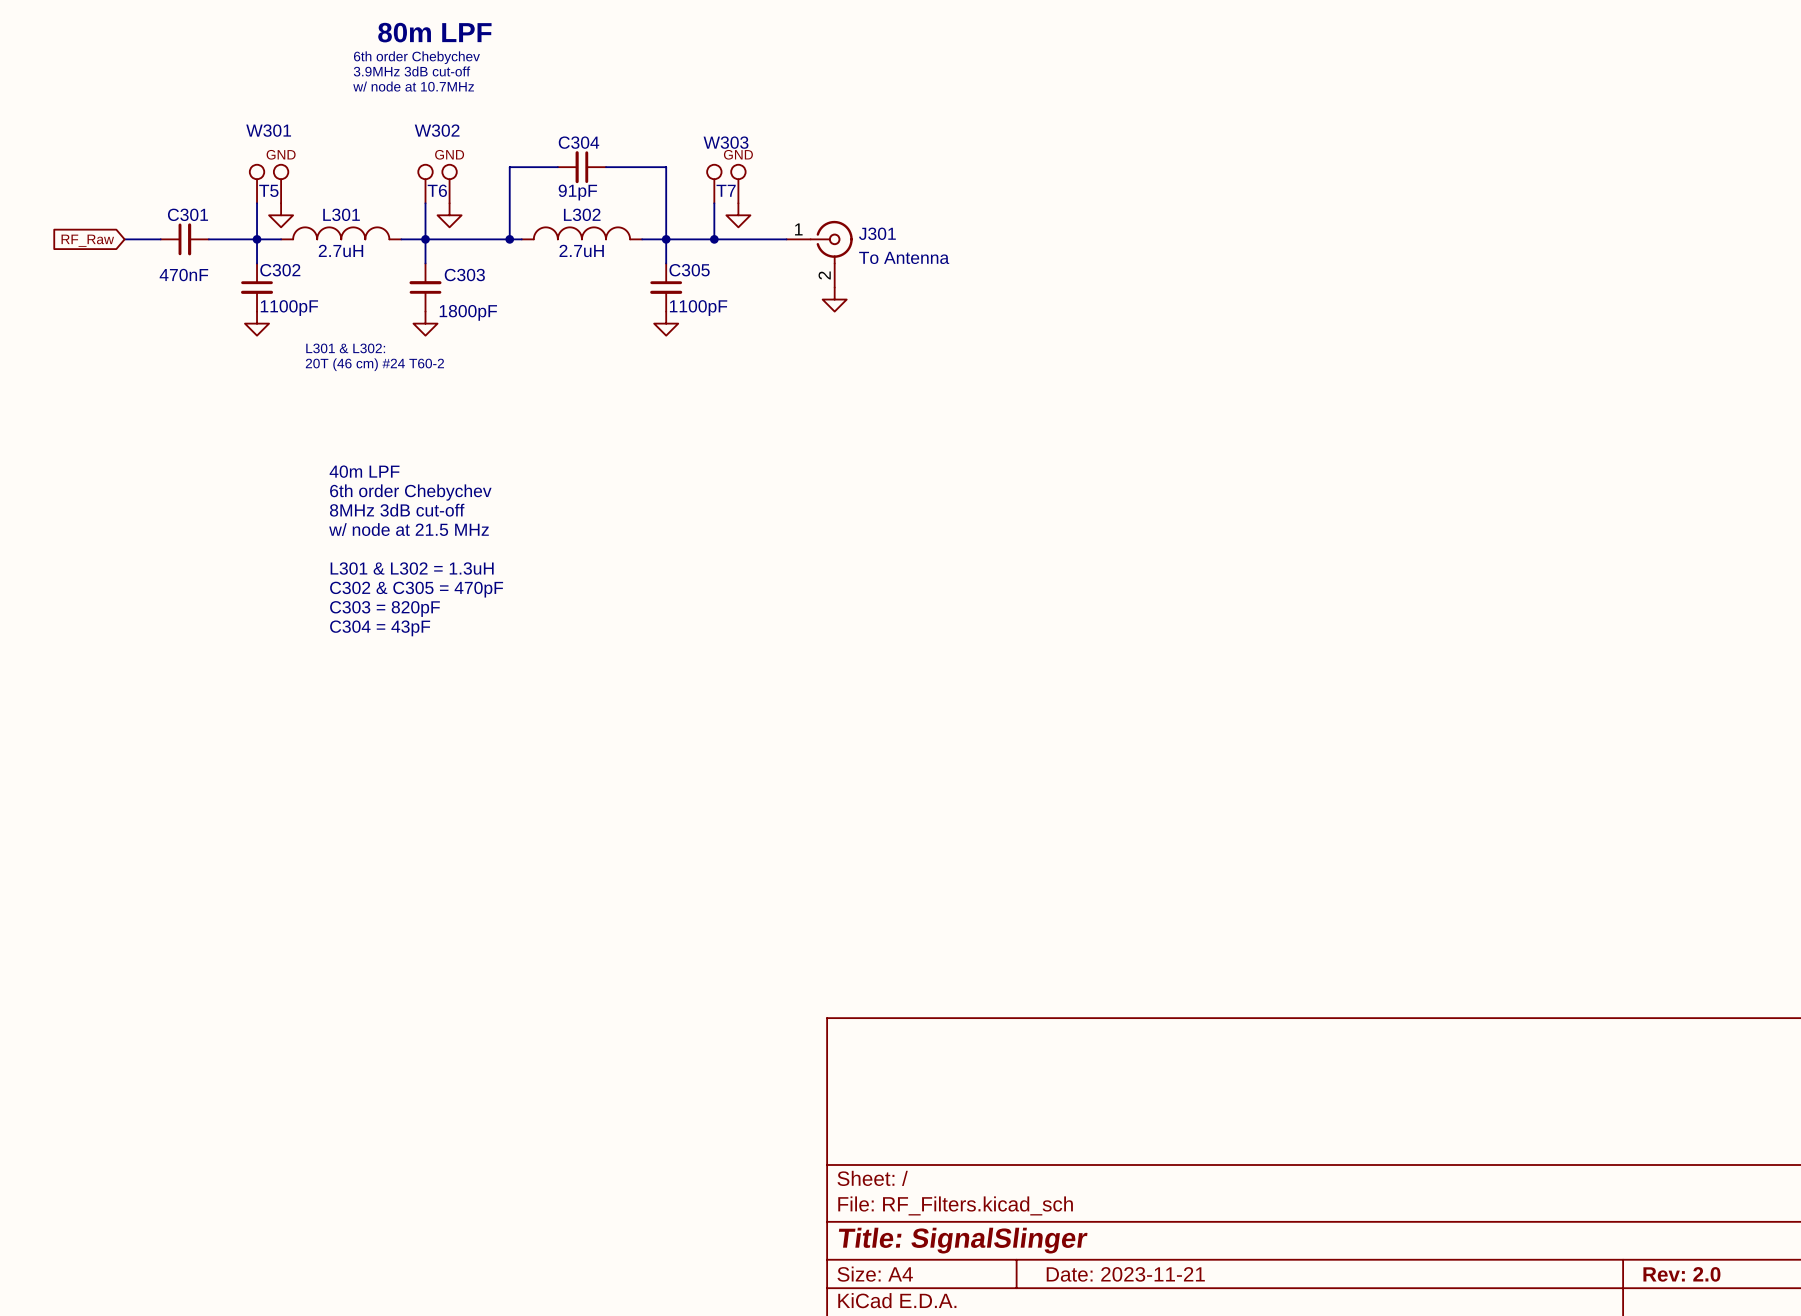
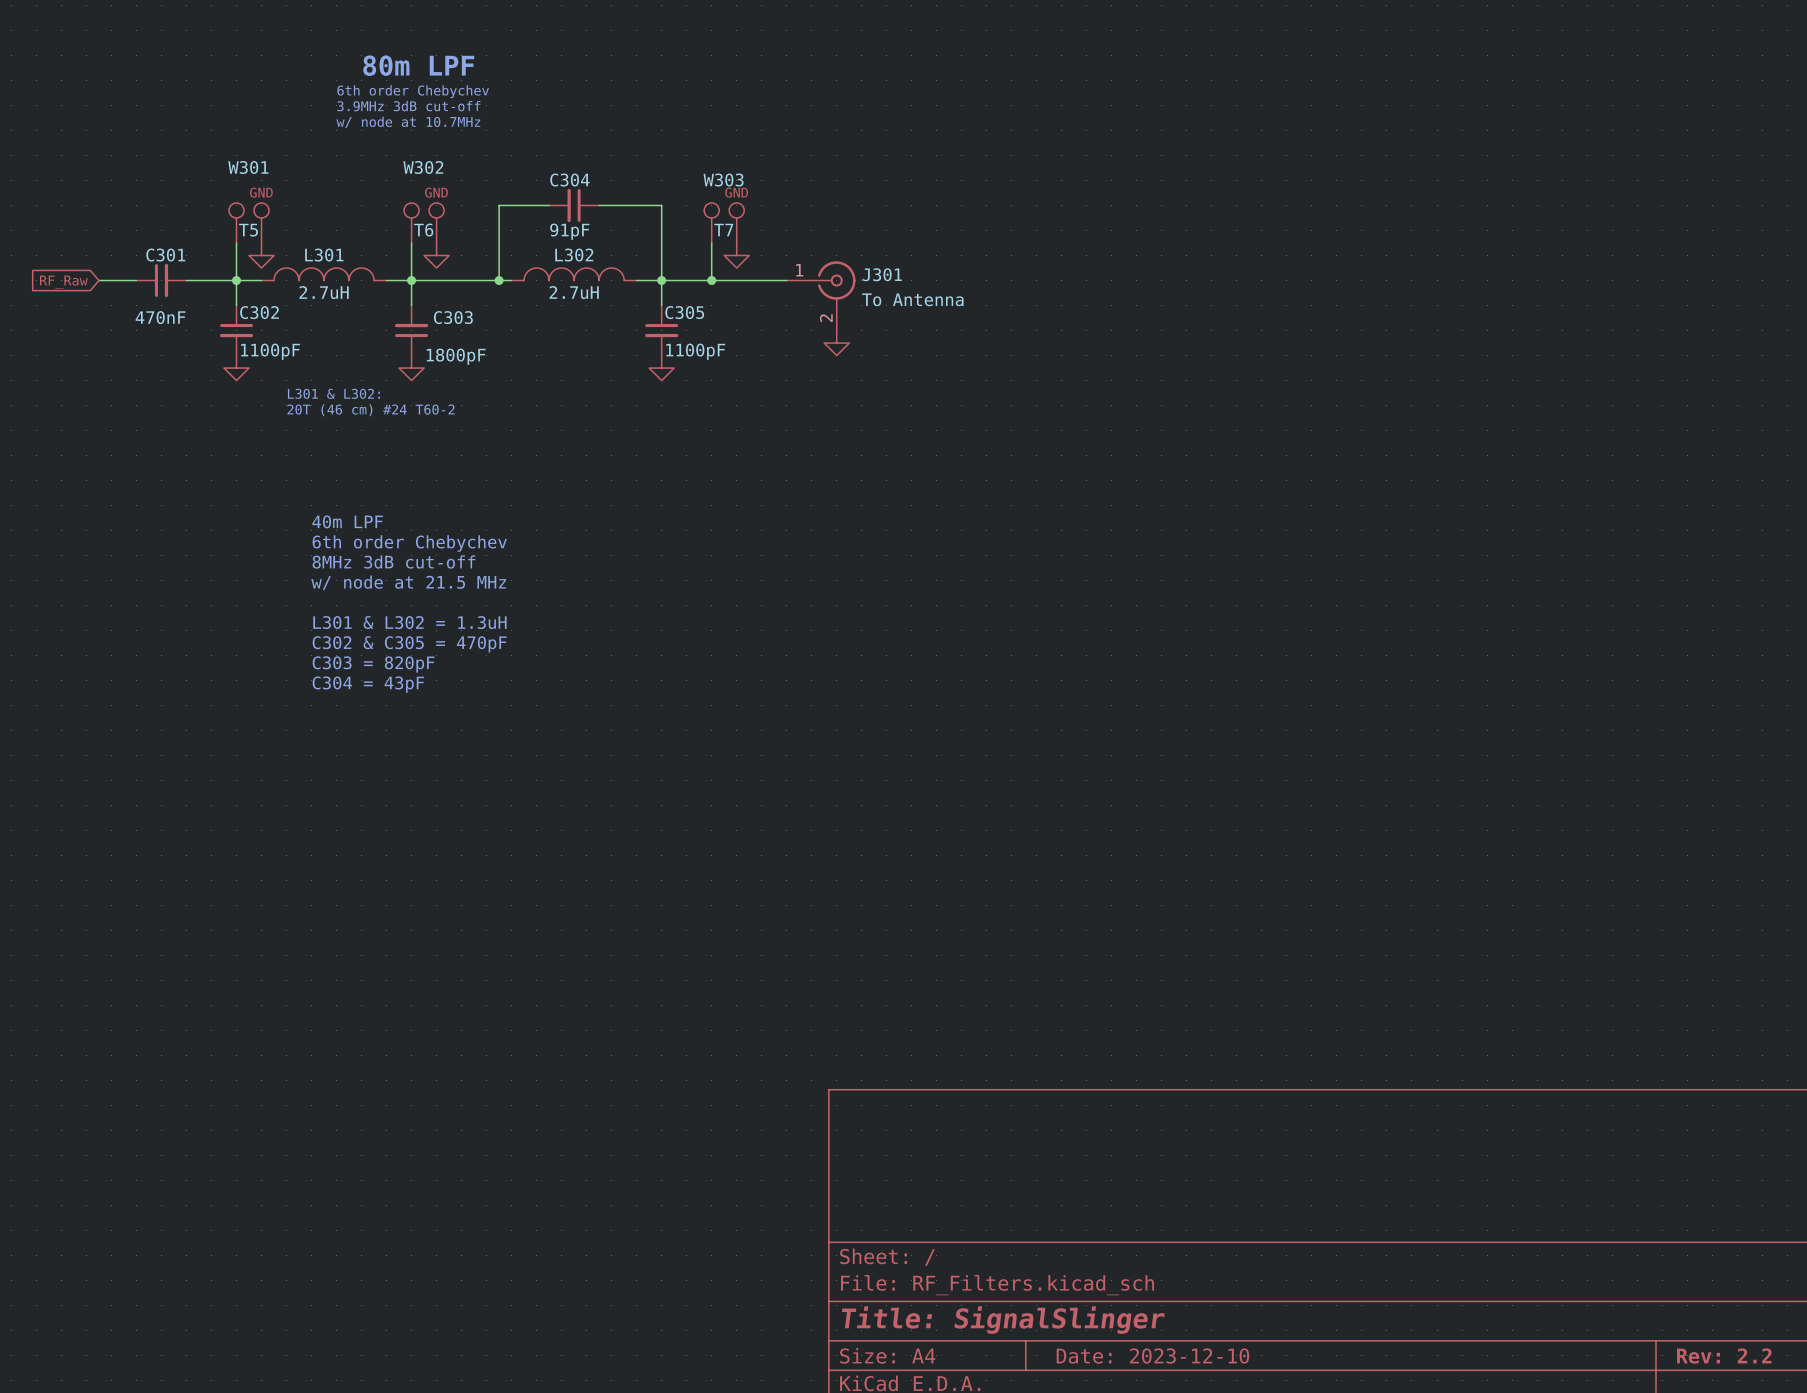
title block: Date: 2023-11-21 (1125, 1274) -> Date: 2023-12-10 (1152, 1356)
title block: Rev: 2.0 (1681, 1274) -> Rev: 2.2 (1724, 1356)

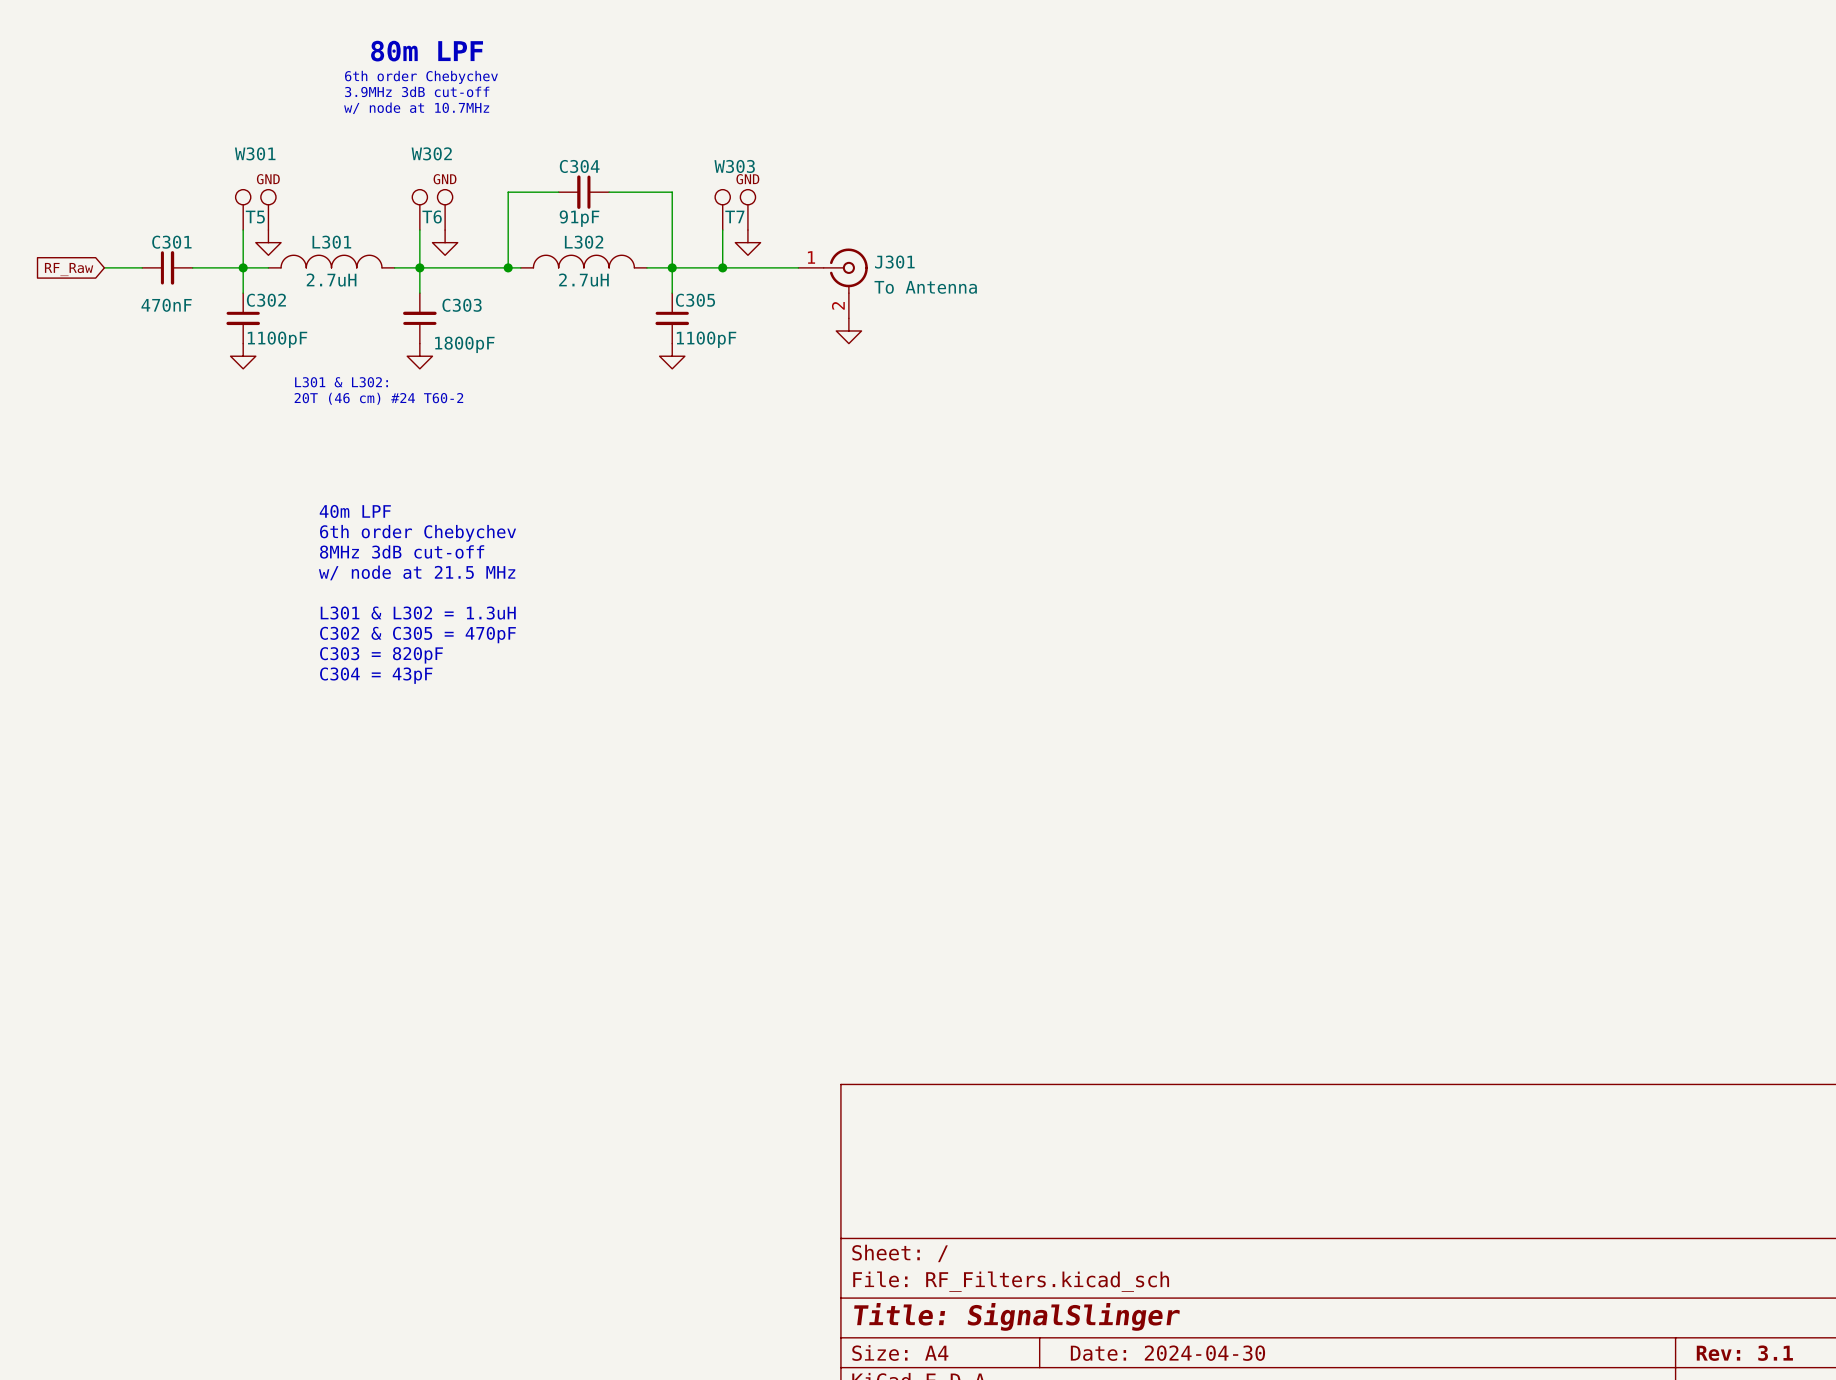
title block: Date: 2023-12-10 (1152, 1356) -> Date: 2024-04-30 (1167, 1353)
title block: Rev: 2.2 (1724, 1356) -> Rev: 3.1 (1744, 1353)

